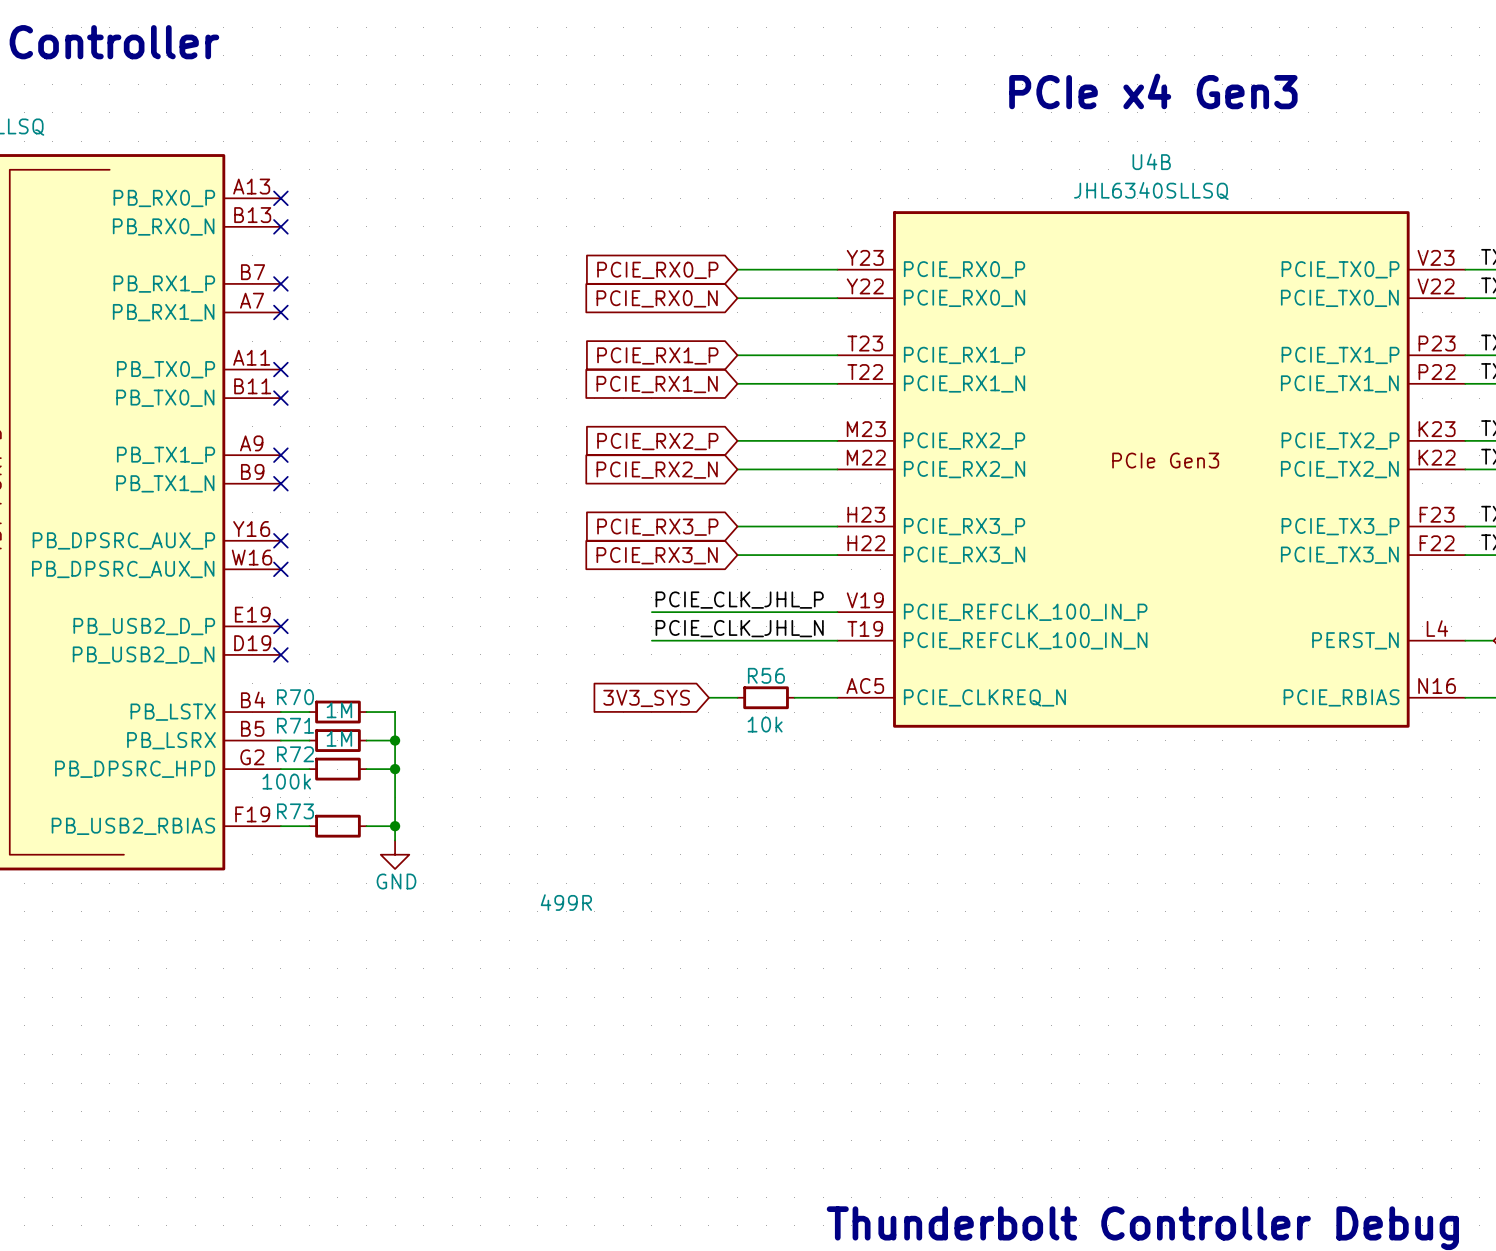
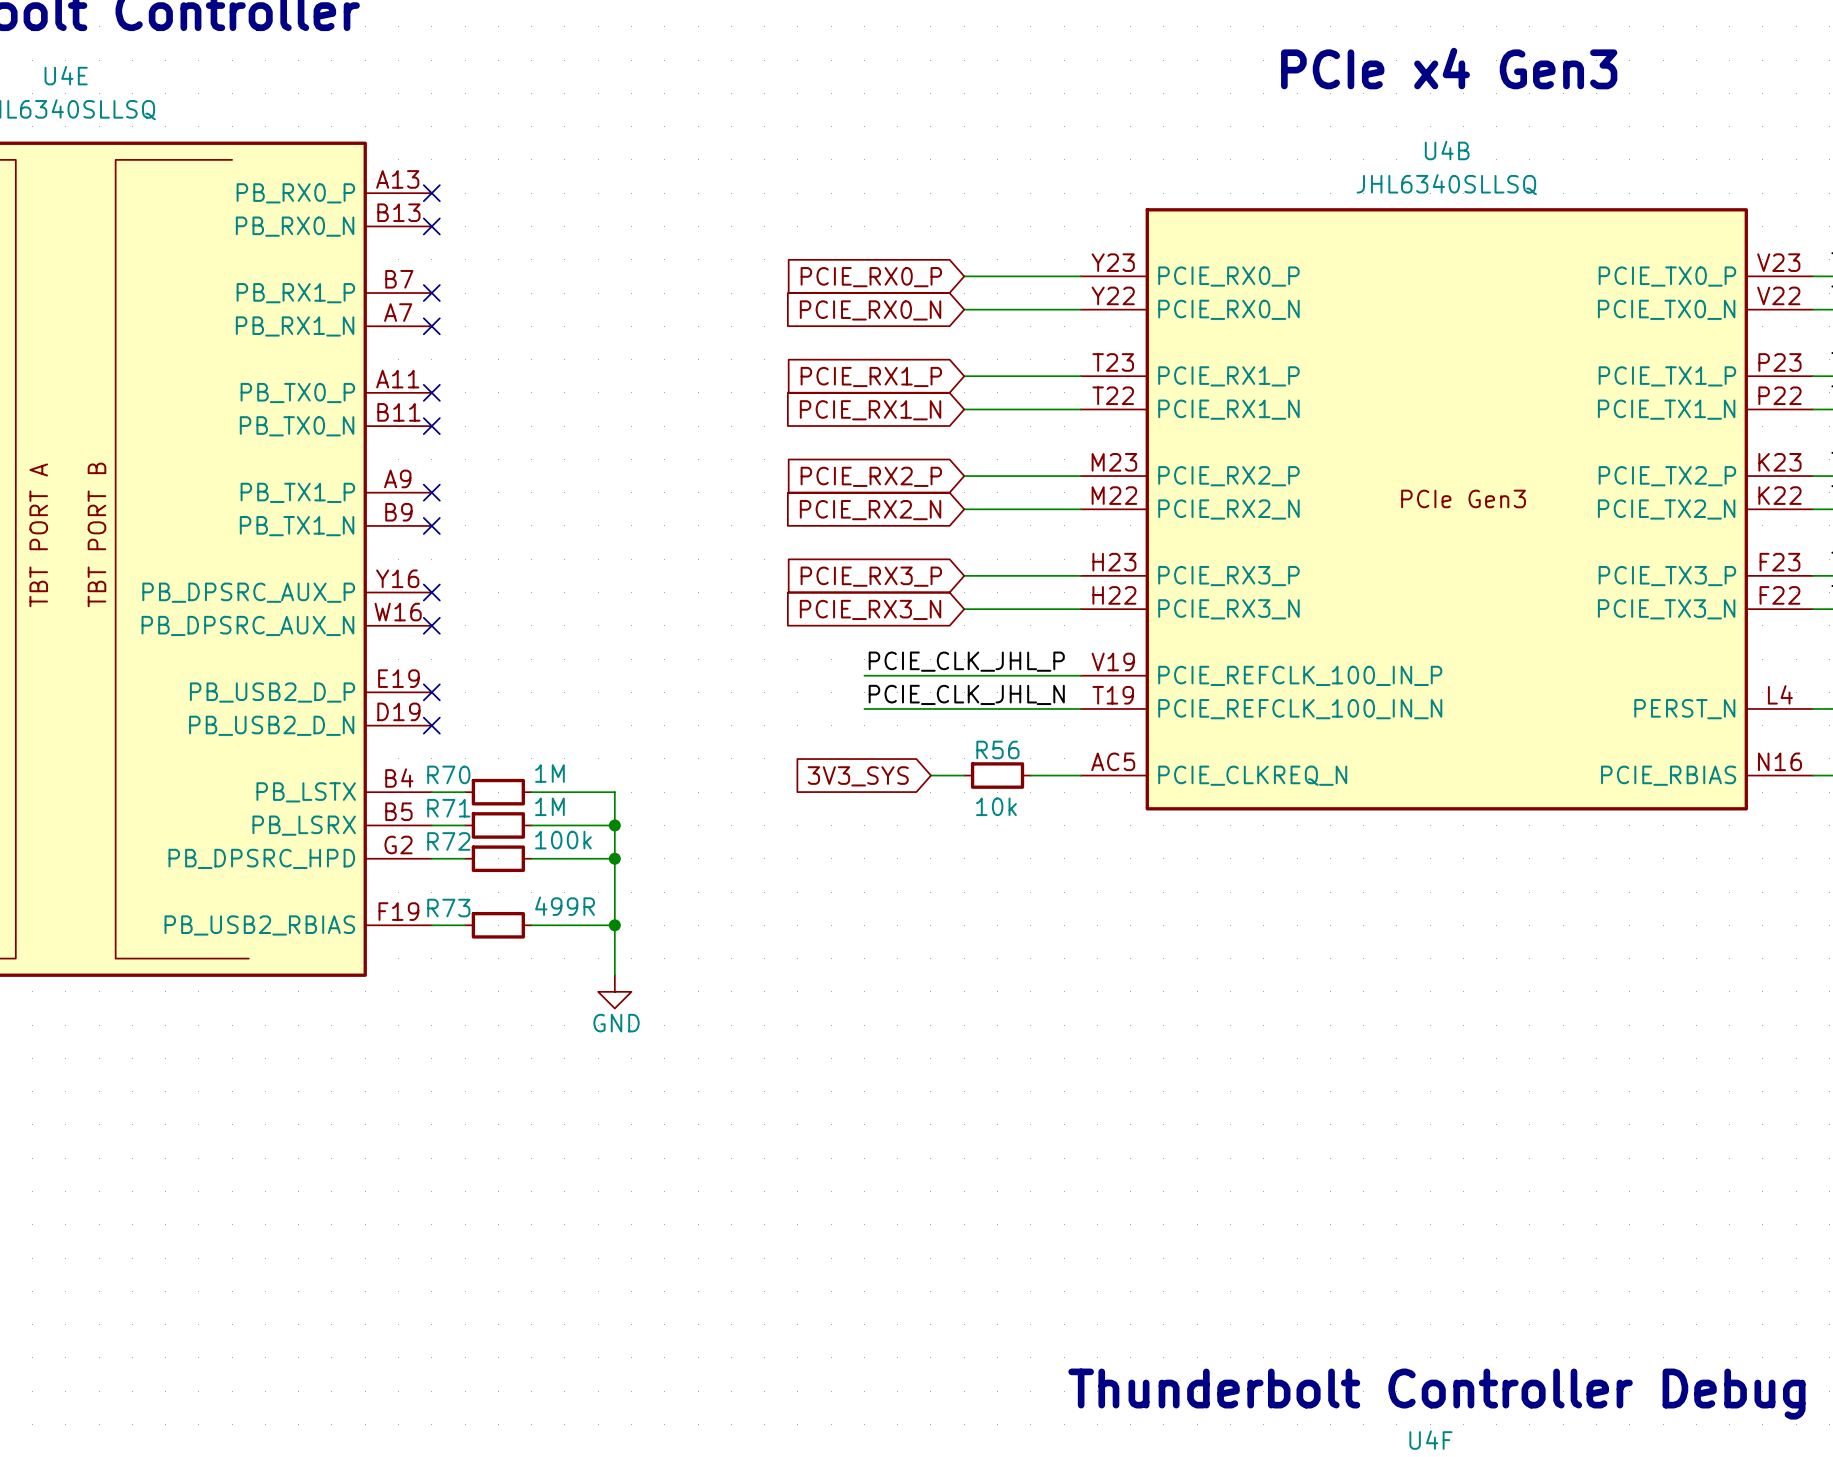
R70 text position: 1M (339, 710) -> 1M (549, 773)
wire: (395, 712) (395, 840) -> (564, 792) (614, 792) (614, 975)
R71 text position: 1M (339, 738) -> 1M (549, 806)
wire: none -> (564, 825) (614, 825)
junction: (395, 740) -> none
junction: none -> (614, 825)
wire: none -> (564, 858) (614, 858)
junction: (395, 769) -> none
junction: none -> (614, 858)
R72 text position: 100k (286, 781) -> 100k (563, 840)
wire: none -> (564, 925) (614, 925)
junction: (395, 826) -> none
junction: none -> (614, 925)
power symbol position: GND (395, 854) -> GND (614, 991)
R73 text position: 499R (566, 902) -> 499R (565, 906)

